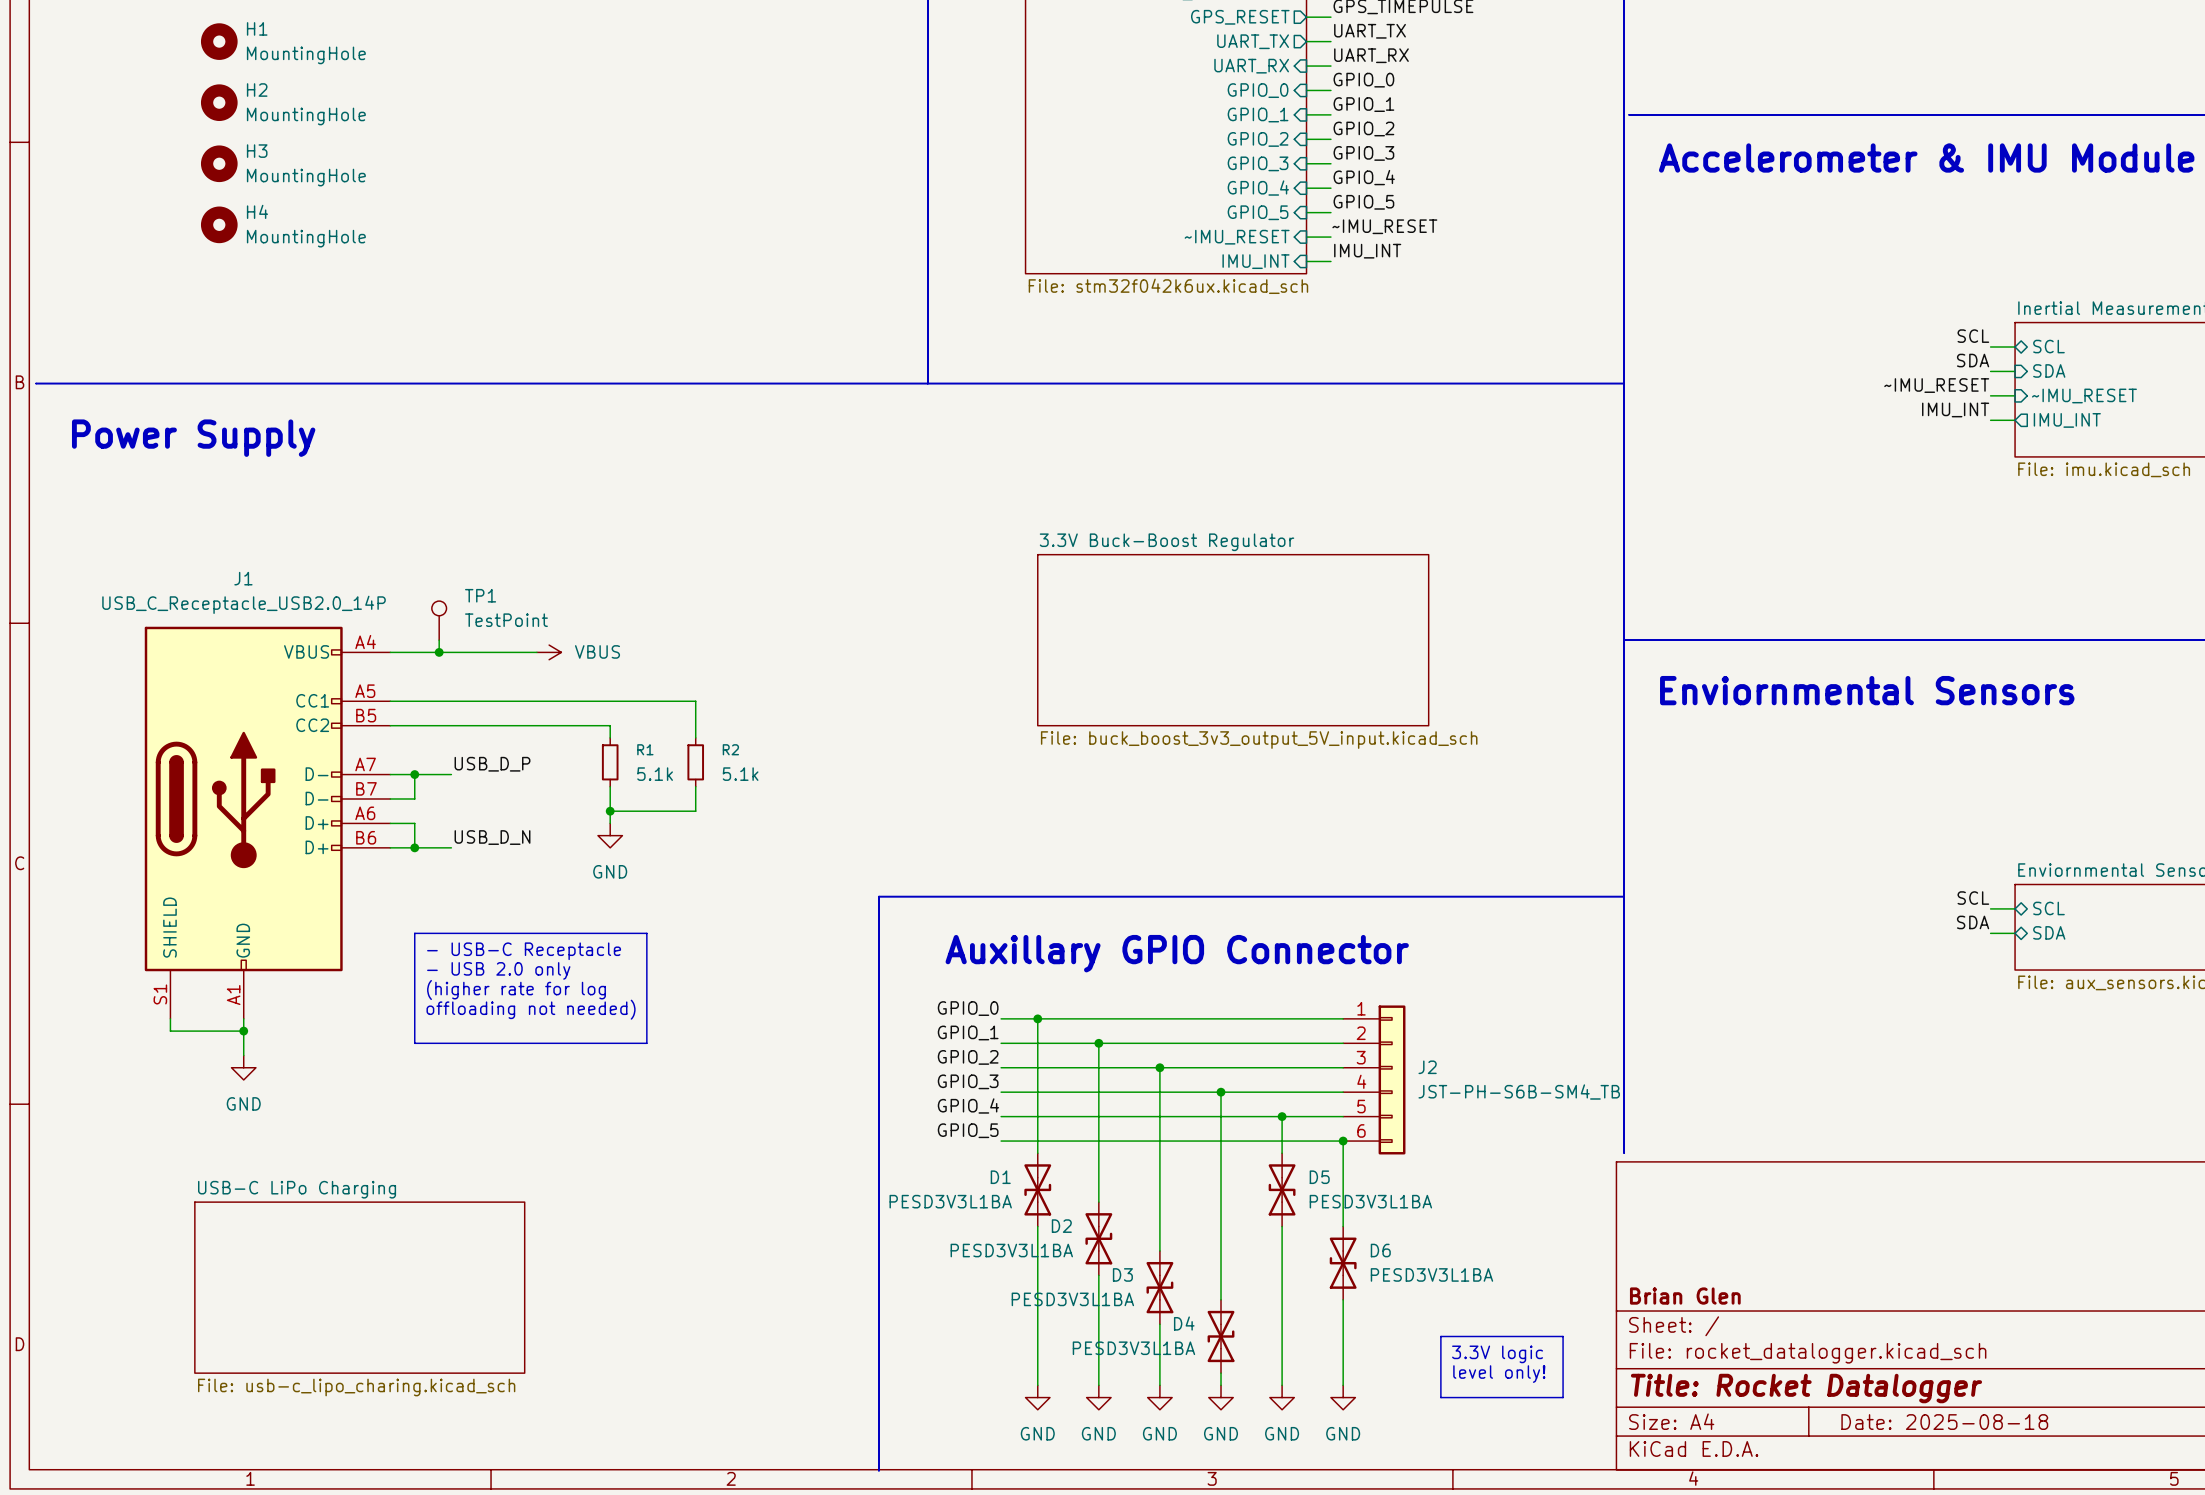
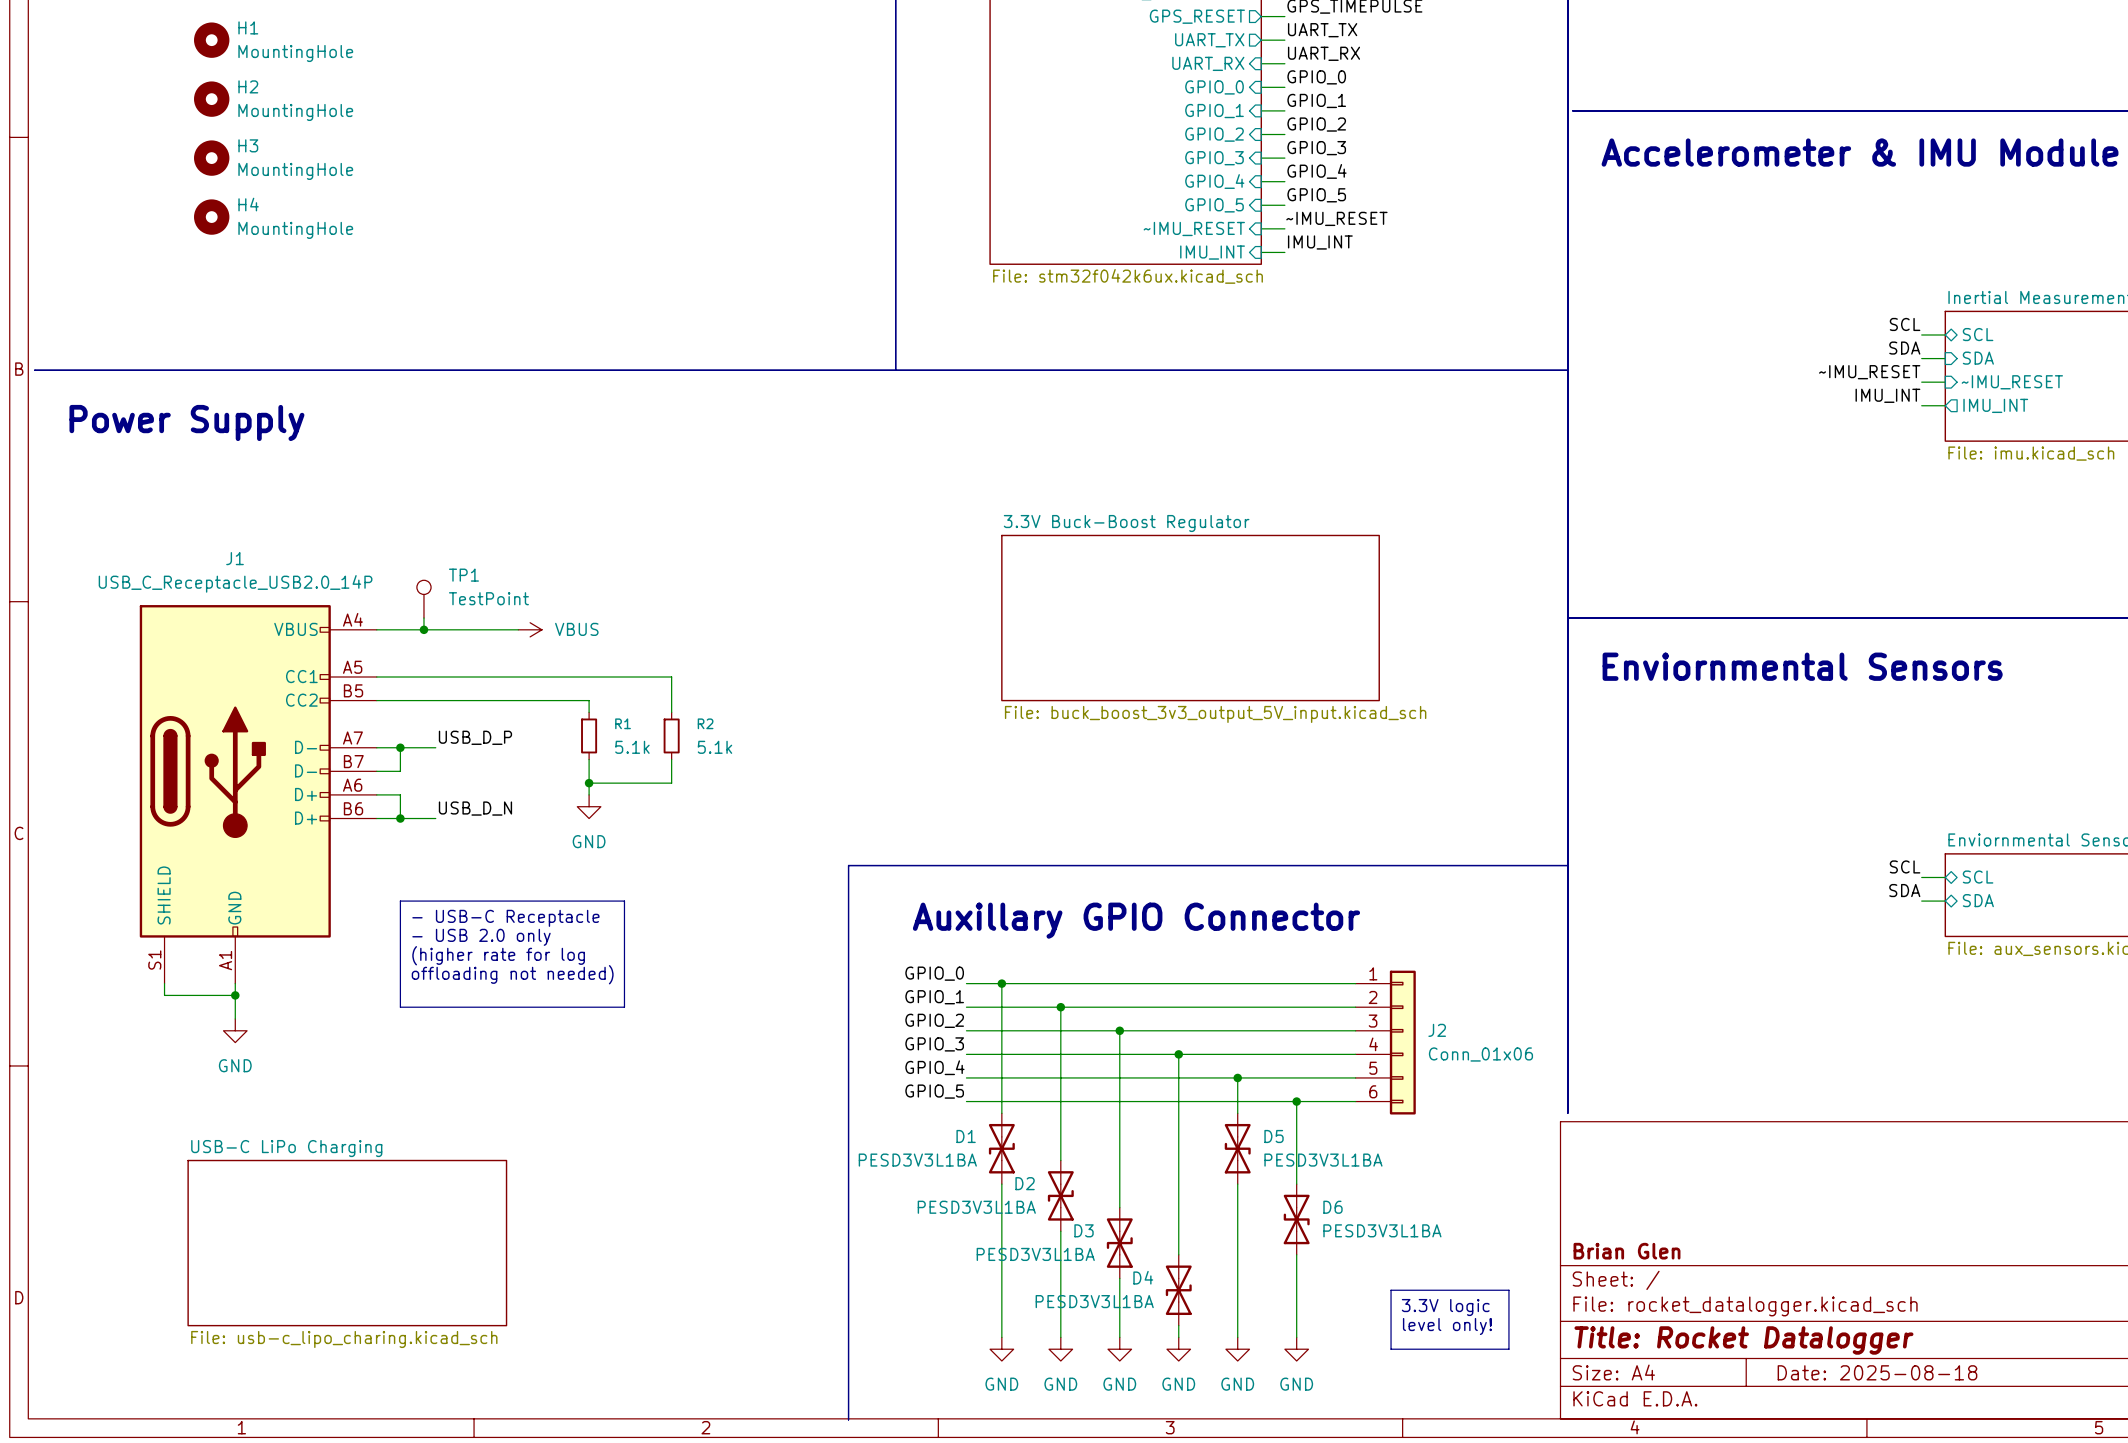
J2 position: (1374, 1079) -> (1385, 1042)
J2 value: JST-PH-S6B-SM4_TB (1519, 1092) -> Conn_01x06 (1480, 1054)

